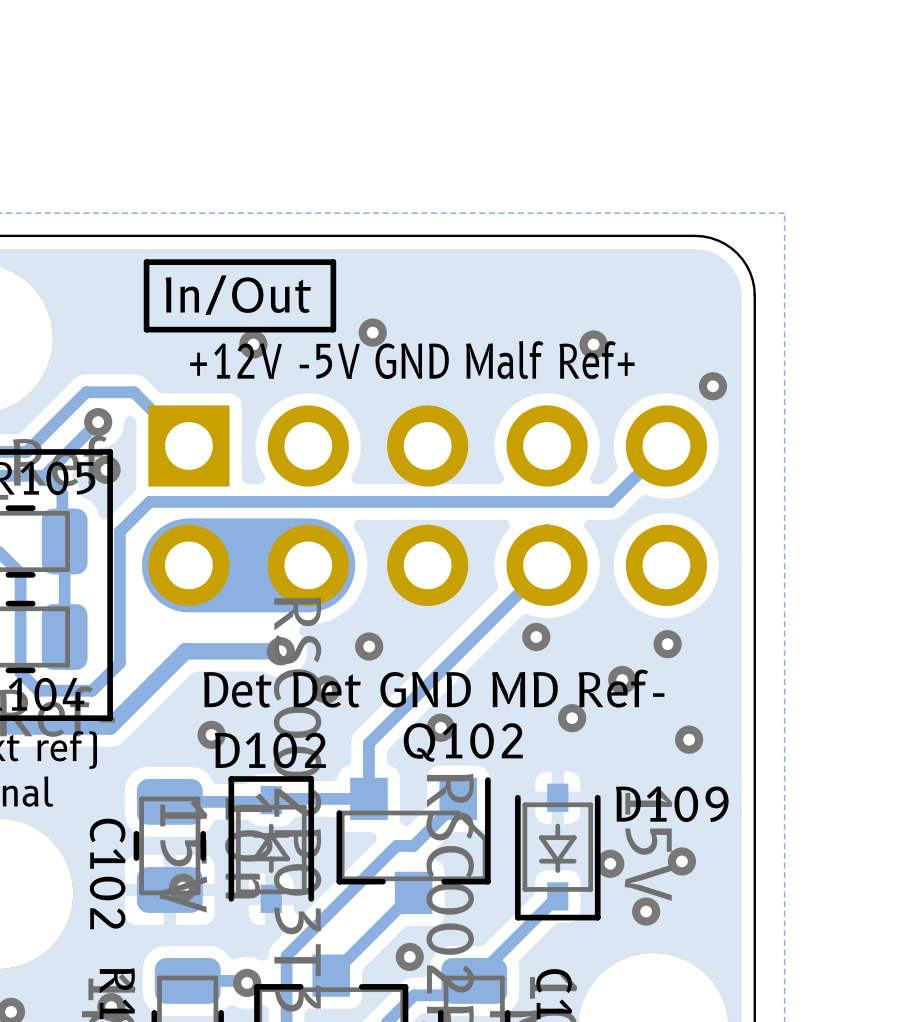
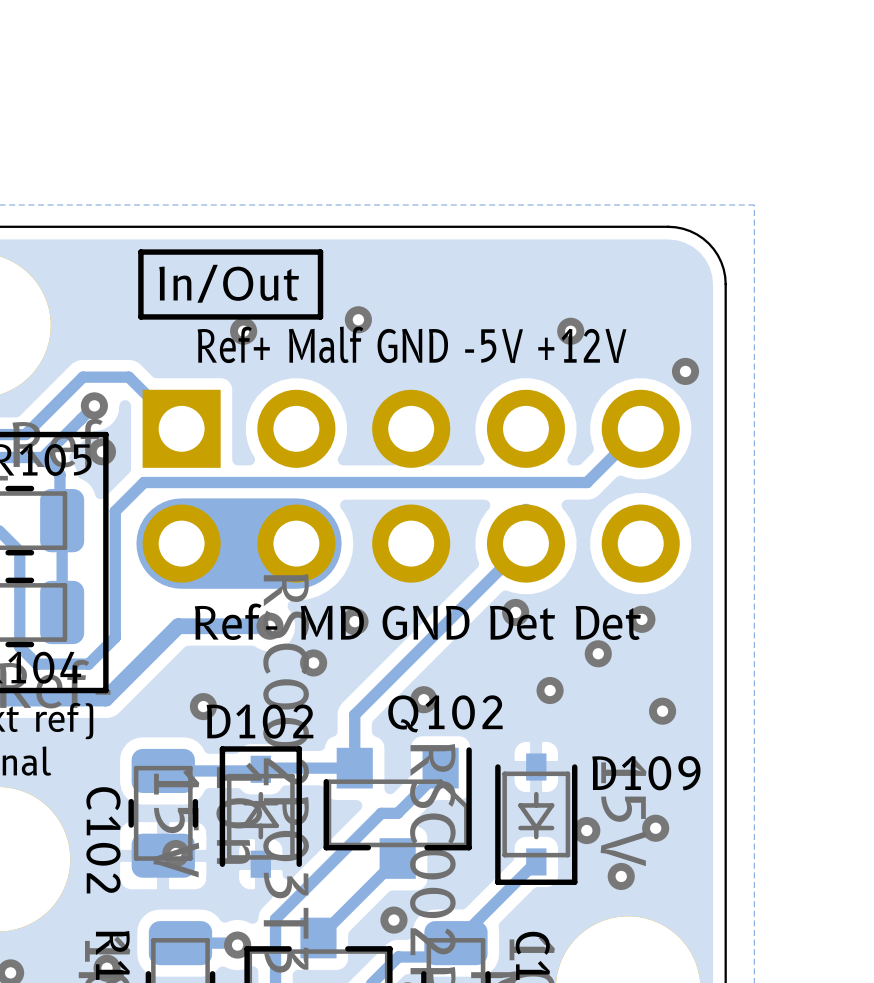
text: +12V -5V GND Malf Ref+ (412, 360) -> Ref+ Malf GND -5V +12V (412, 344)
text: Det Det GND MD Ref- (434, 688) -> Ref- MD GND Det Det (417, 621)

